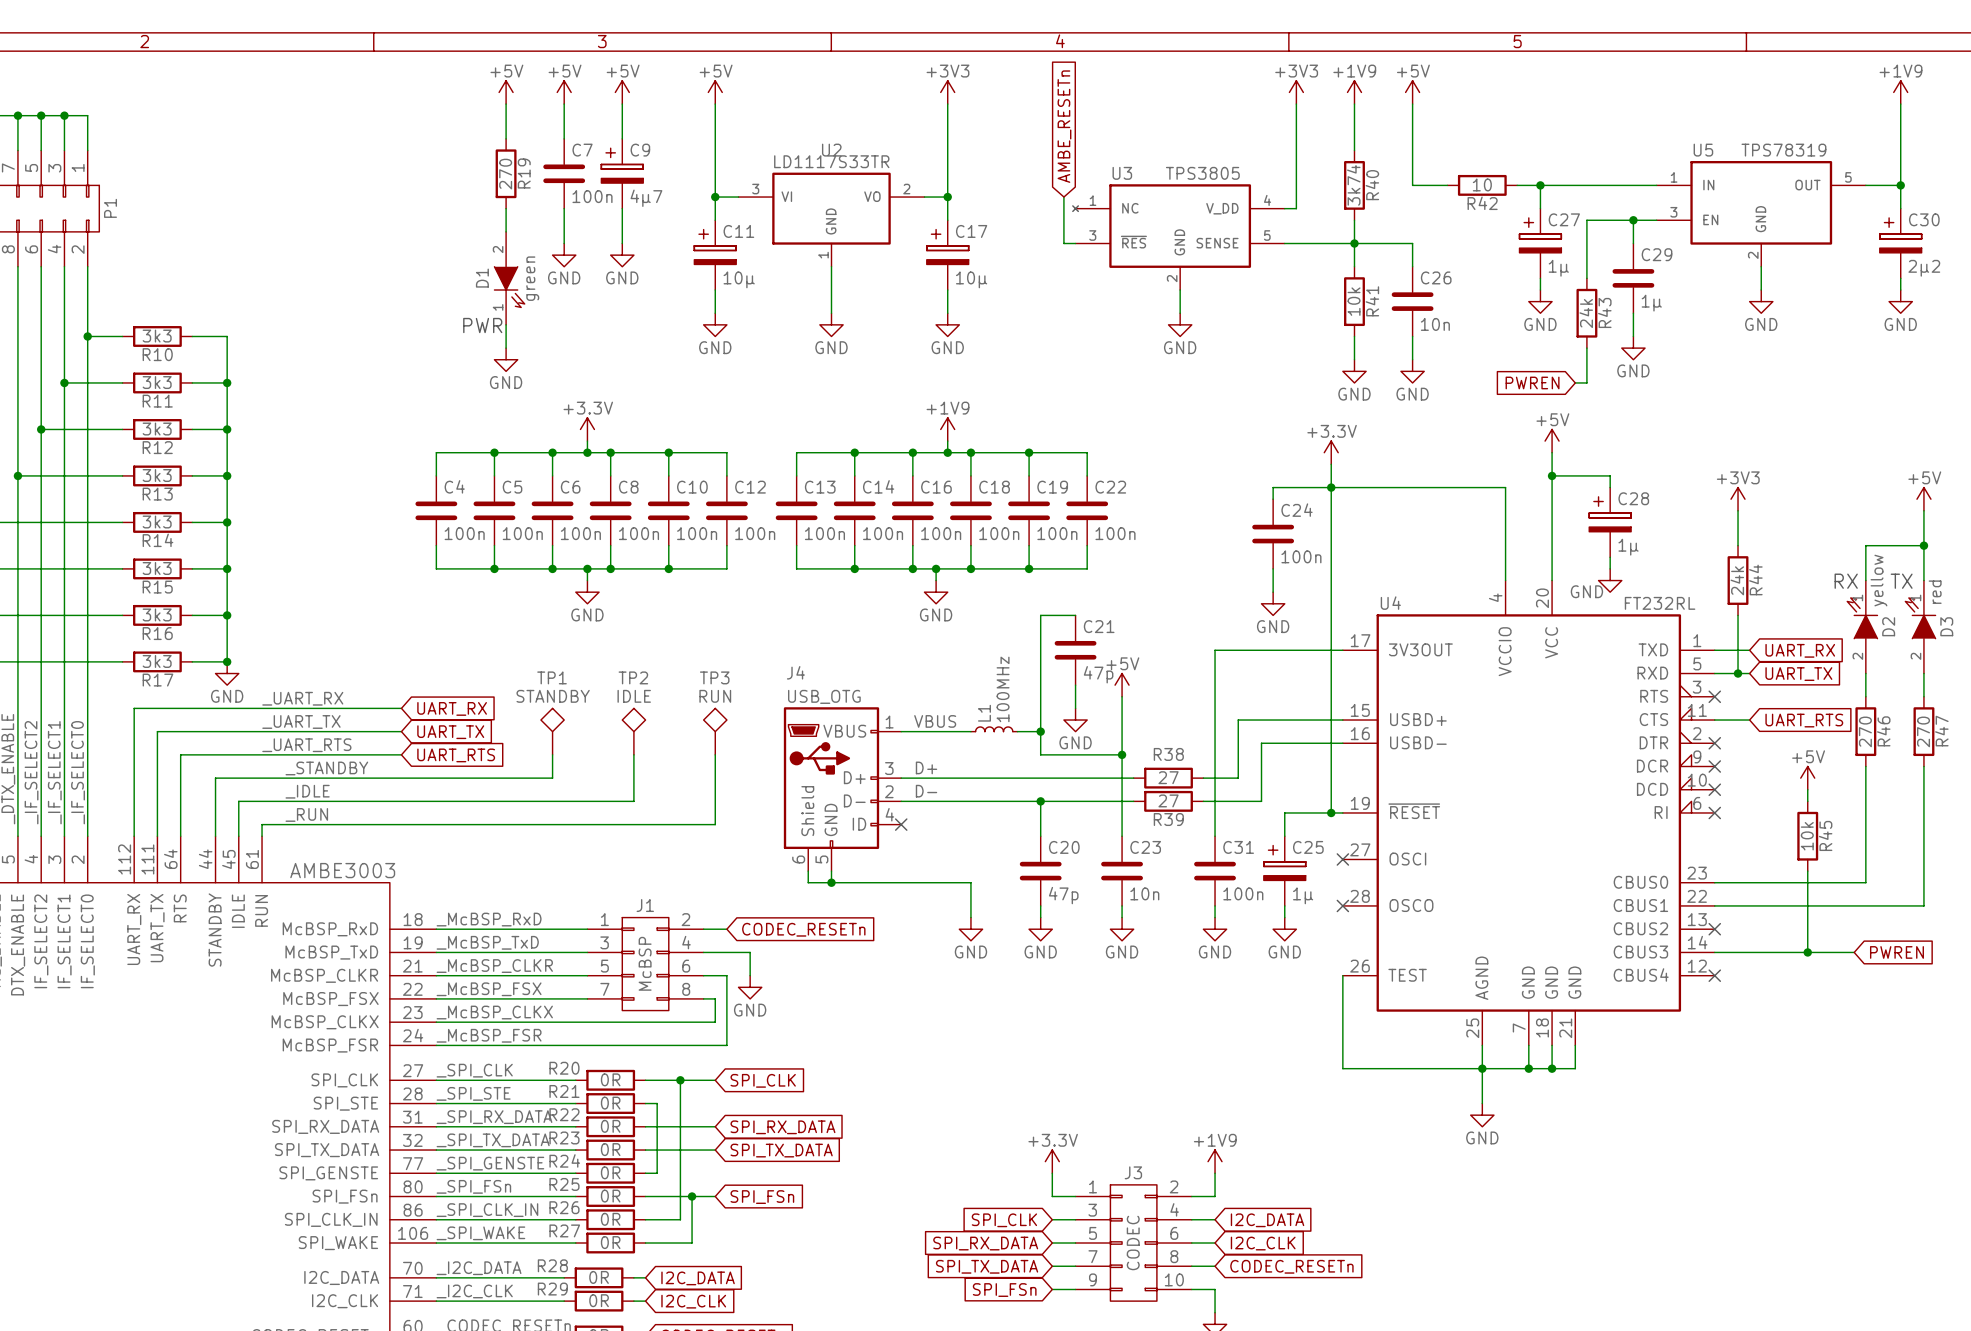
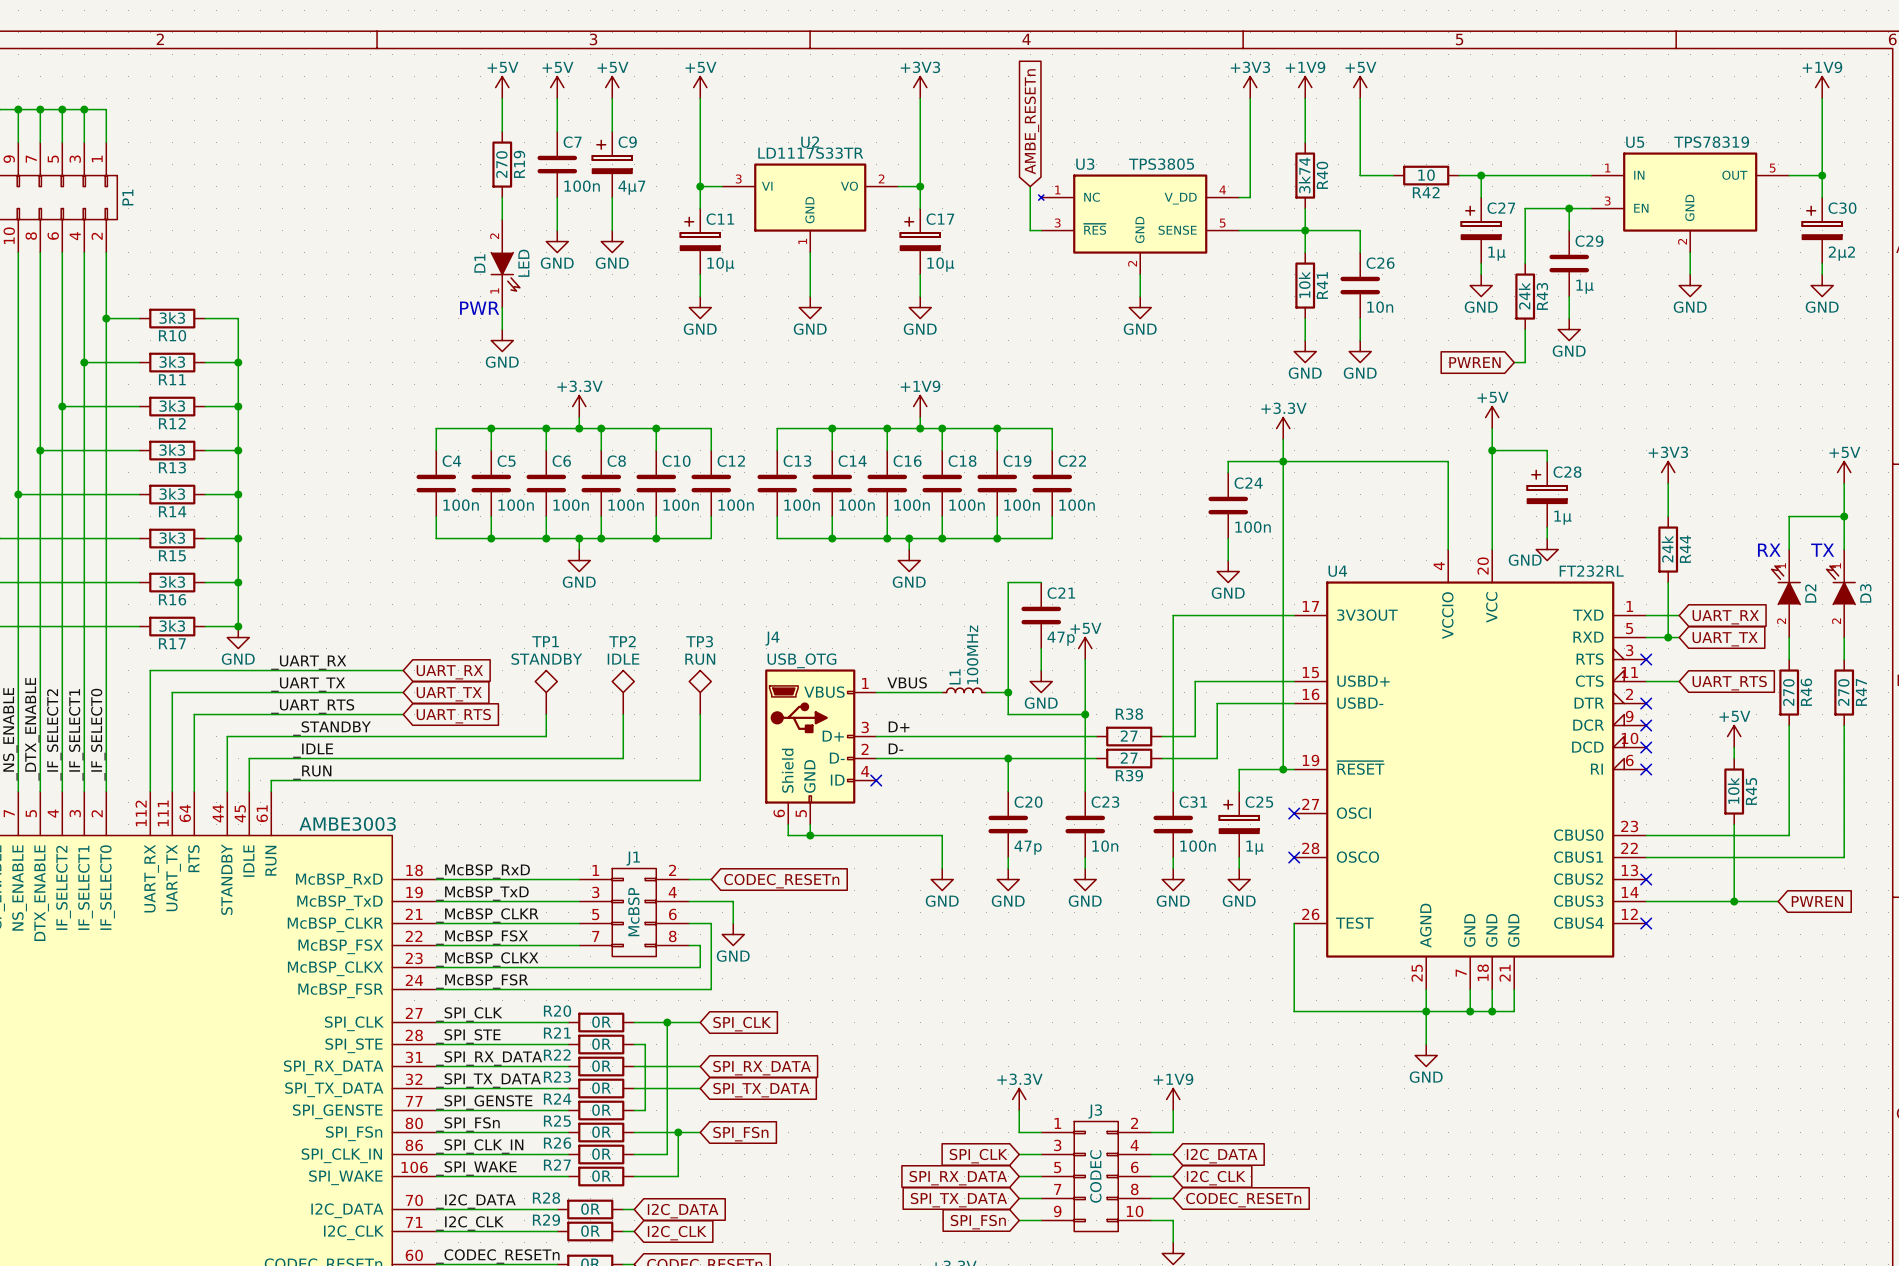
D1 value: green (532, 278) -> LED (523, 263)
D2 value: yellow (1878, 580) -> none
D3 value: red (1935, 592) -> none

